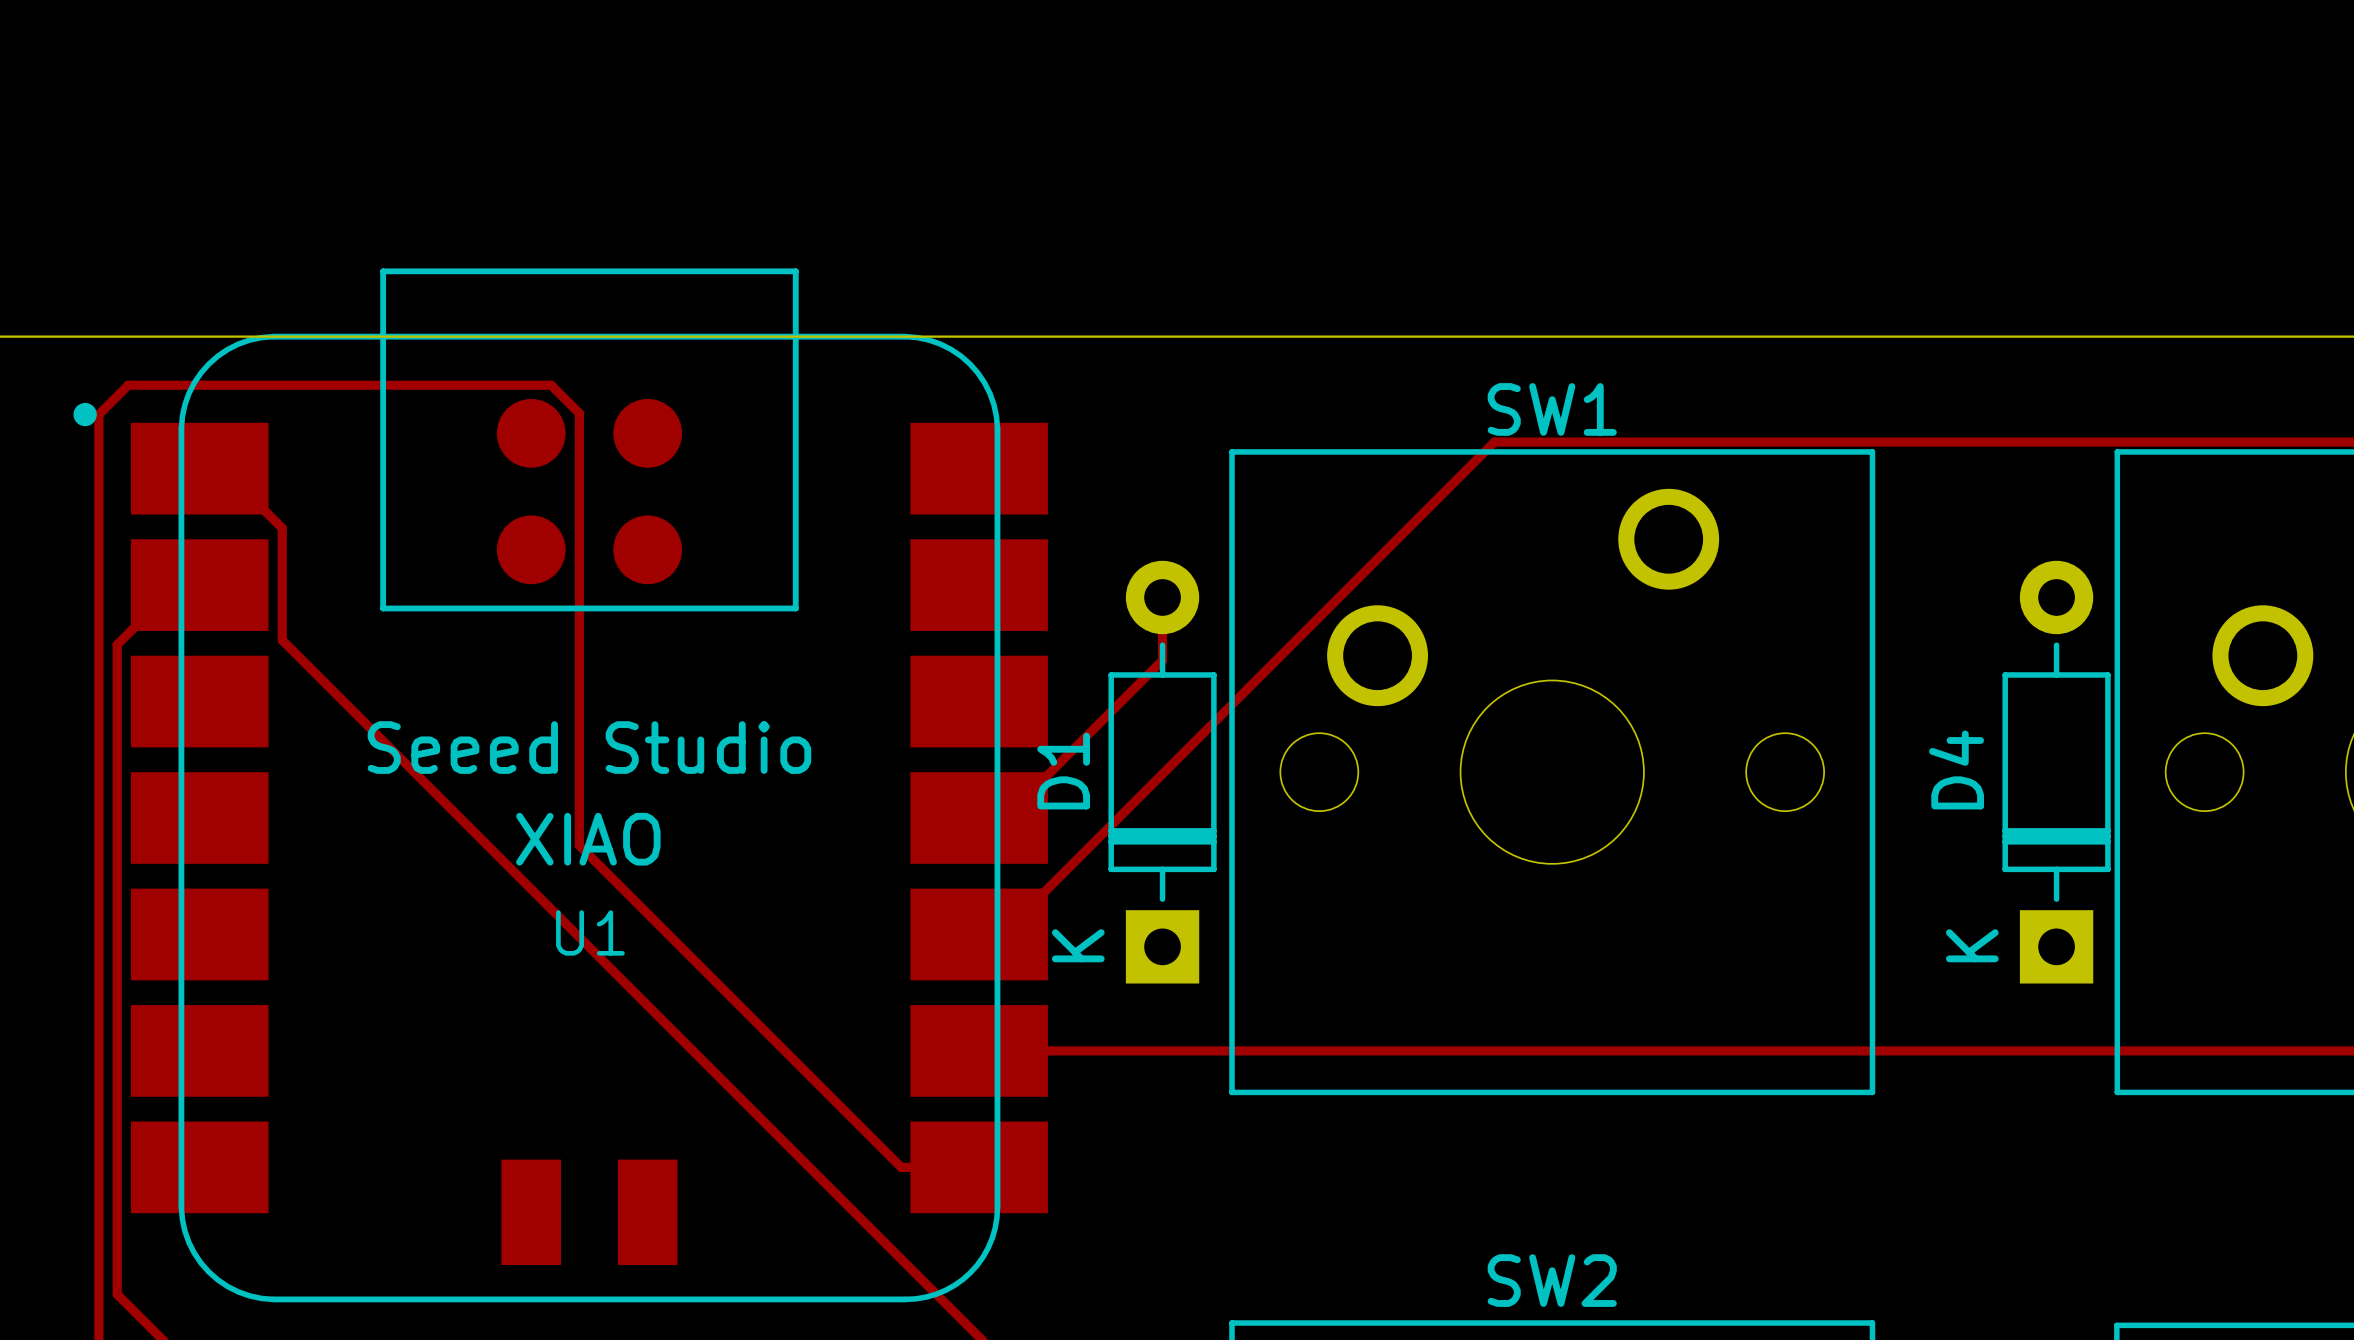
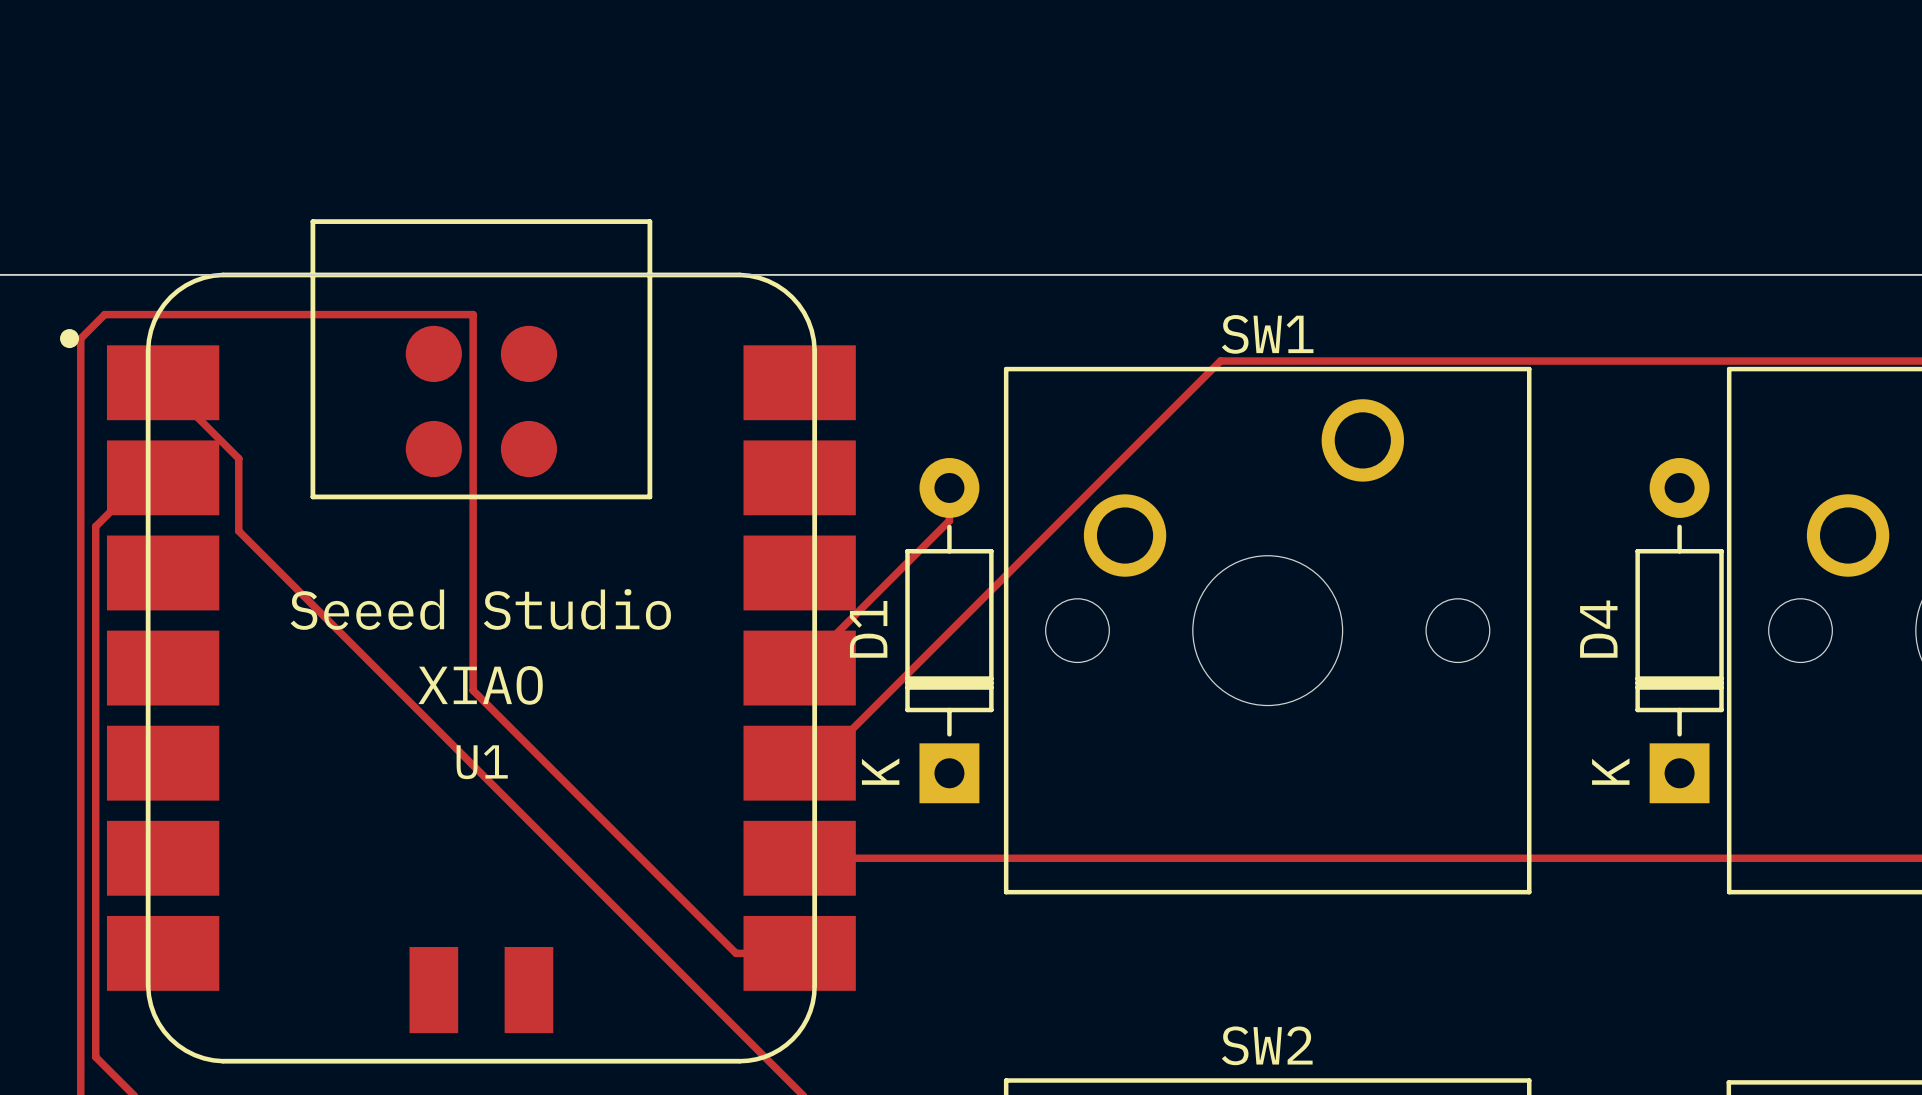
track: (551, 385) (579, 413) -> (450, 314) (473, 314) (473, 337)
track: (199, 468) (222, 468) (282, 528) (282, 640) (292, 650) -> (163, 382) (238, 458) (238, 531)
track: (1162, 637) (1162, 660) (1004, 818) (982, 818) -> (949, 520) (802, 668)

